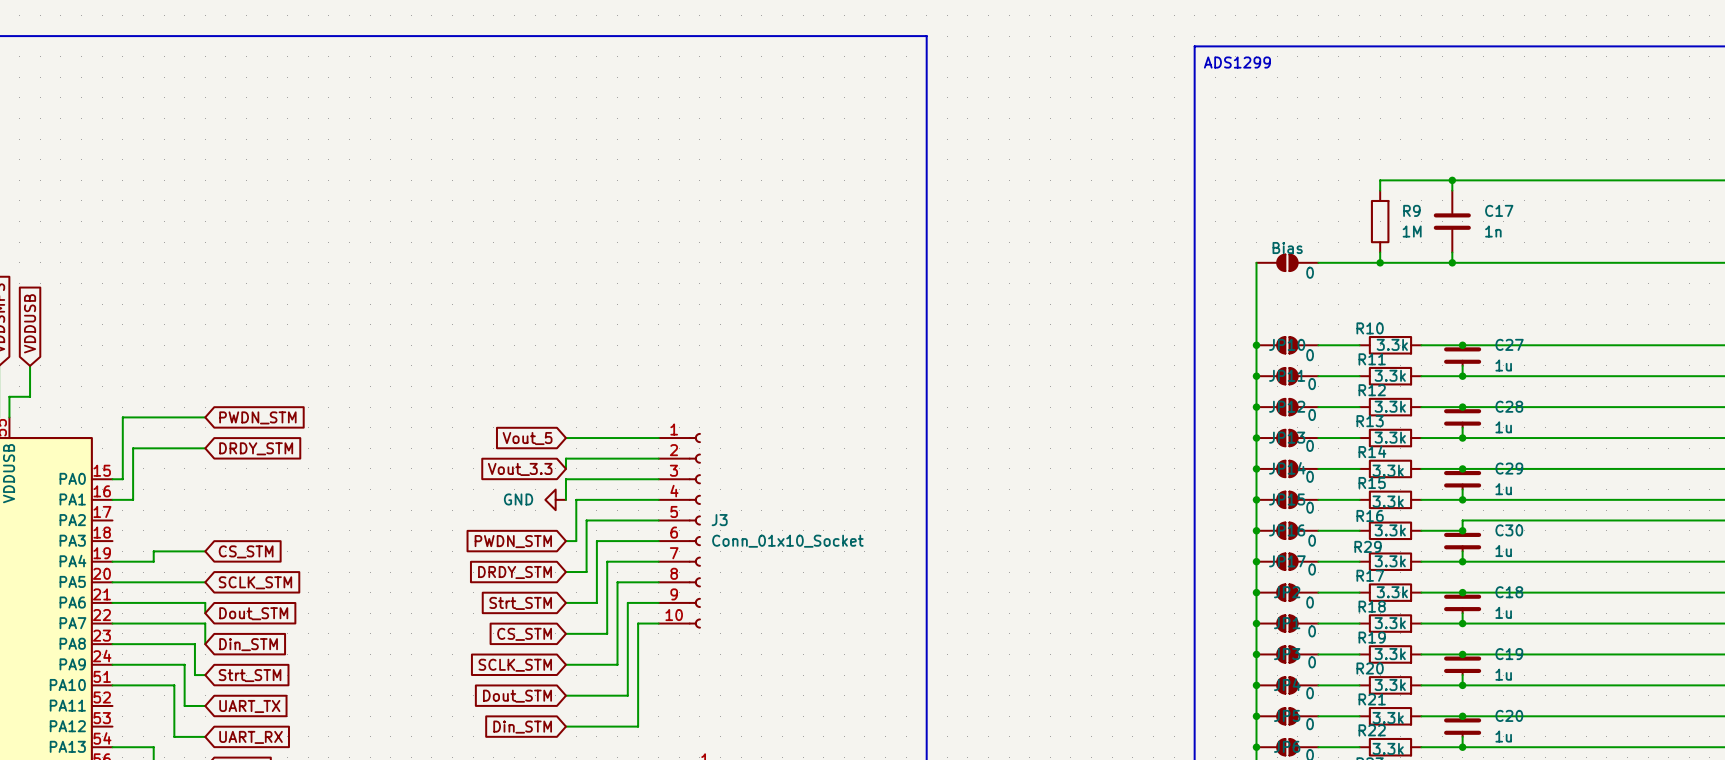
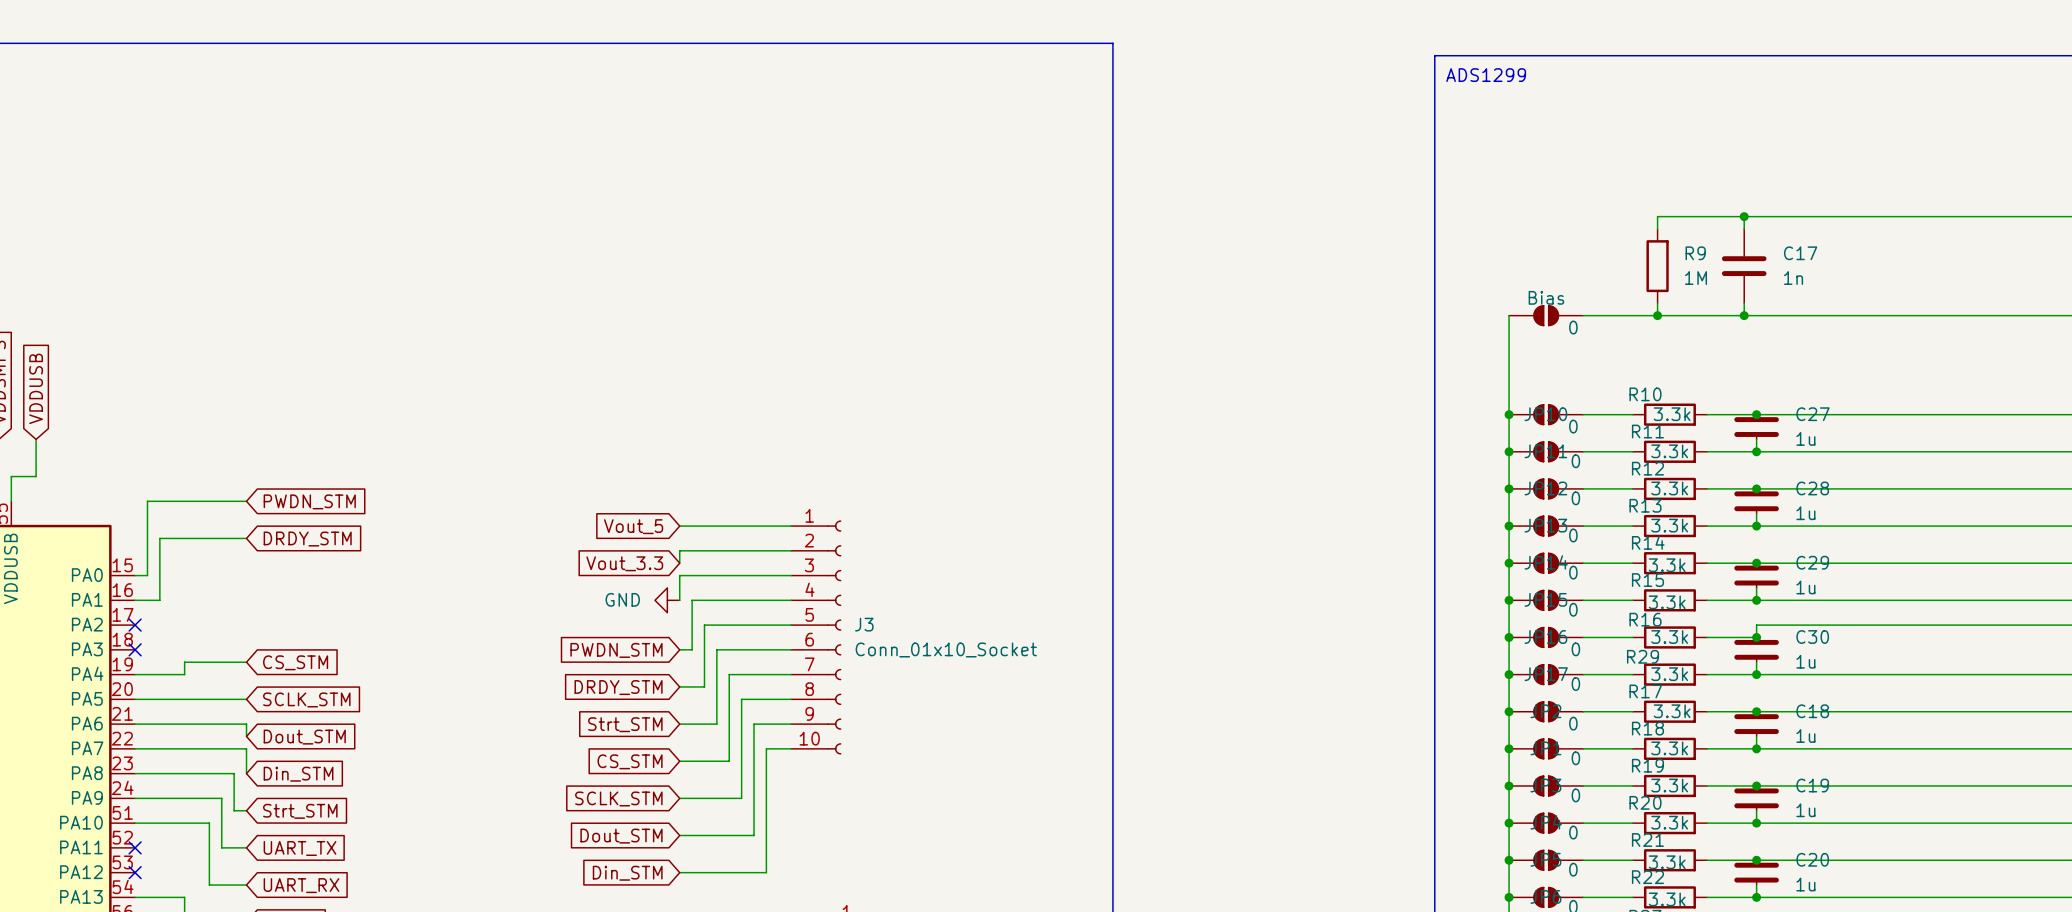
no-connect mark: none -> (135, 625)
no-connect mark: none -> (135, 649)
no-connect mark: none -> (135, 847)
no-connect mark: none -> (135, 872)

